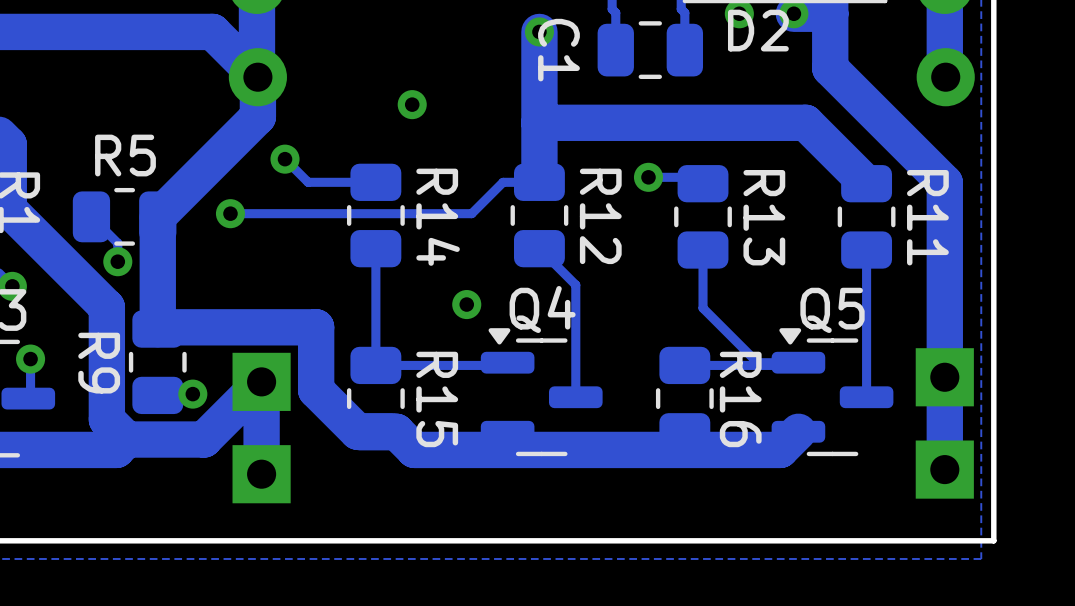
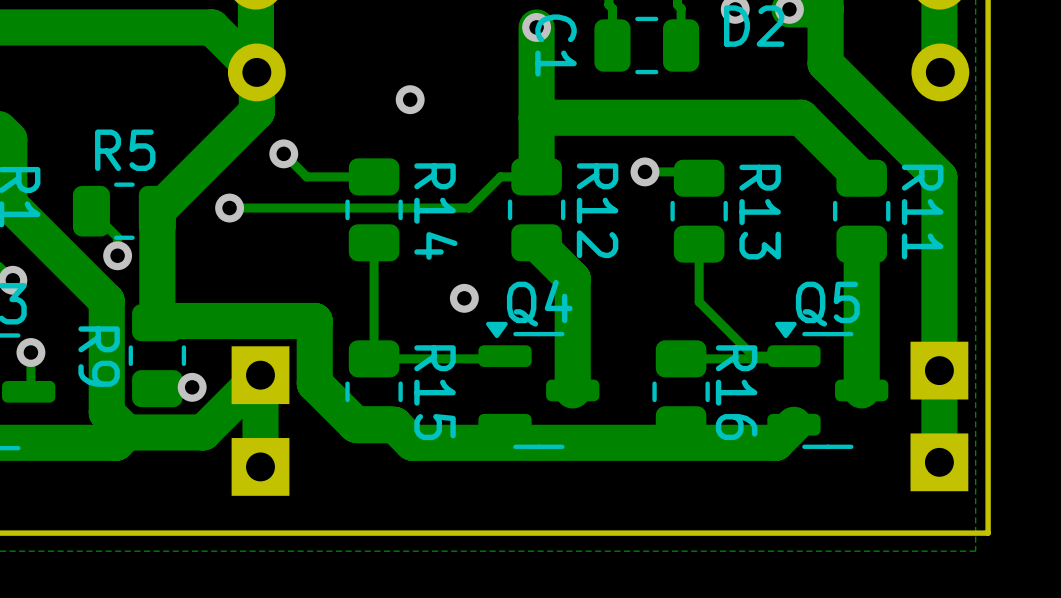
track width: thin (539, 248) (575, 285) (575, 397) -> thick (536, 242) (572, 278) (572, 390)
track width: thin (866, 250) (866, 397) -> thick (861, 244) (861, 390)

